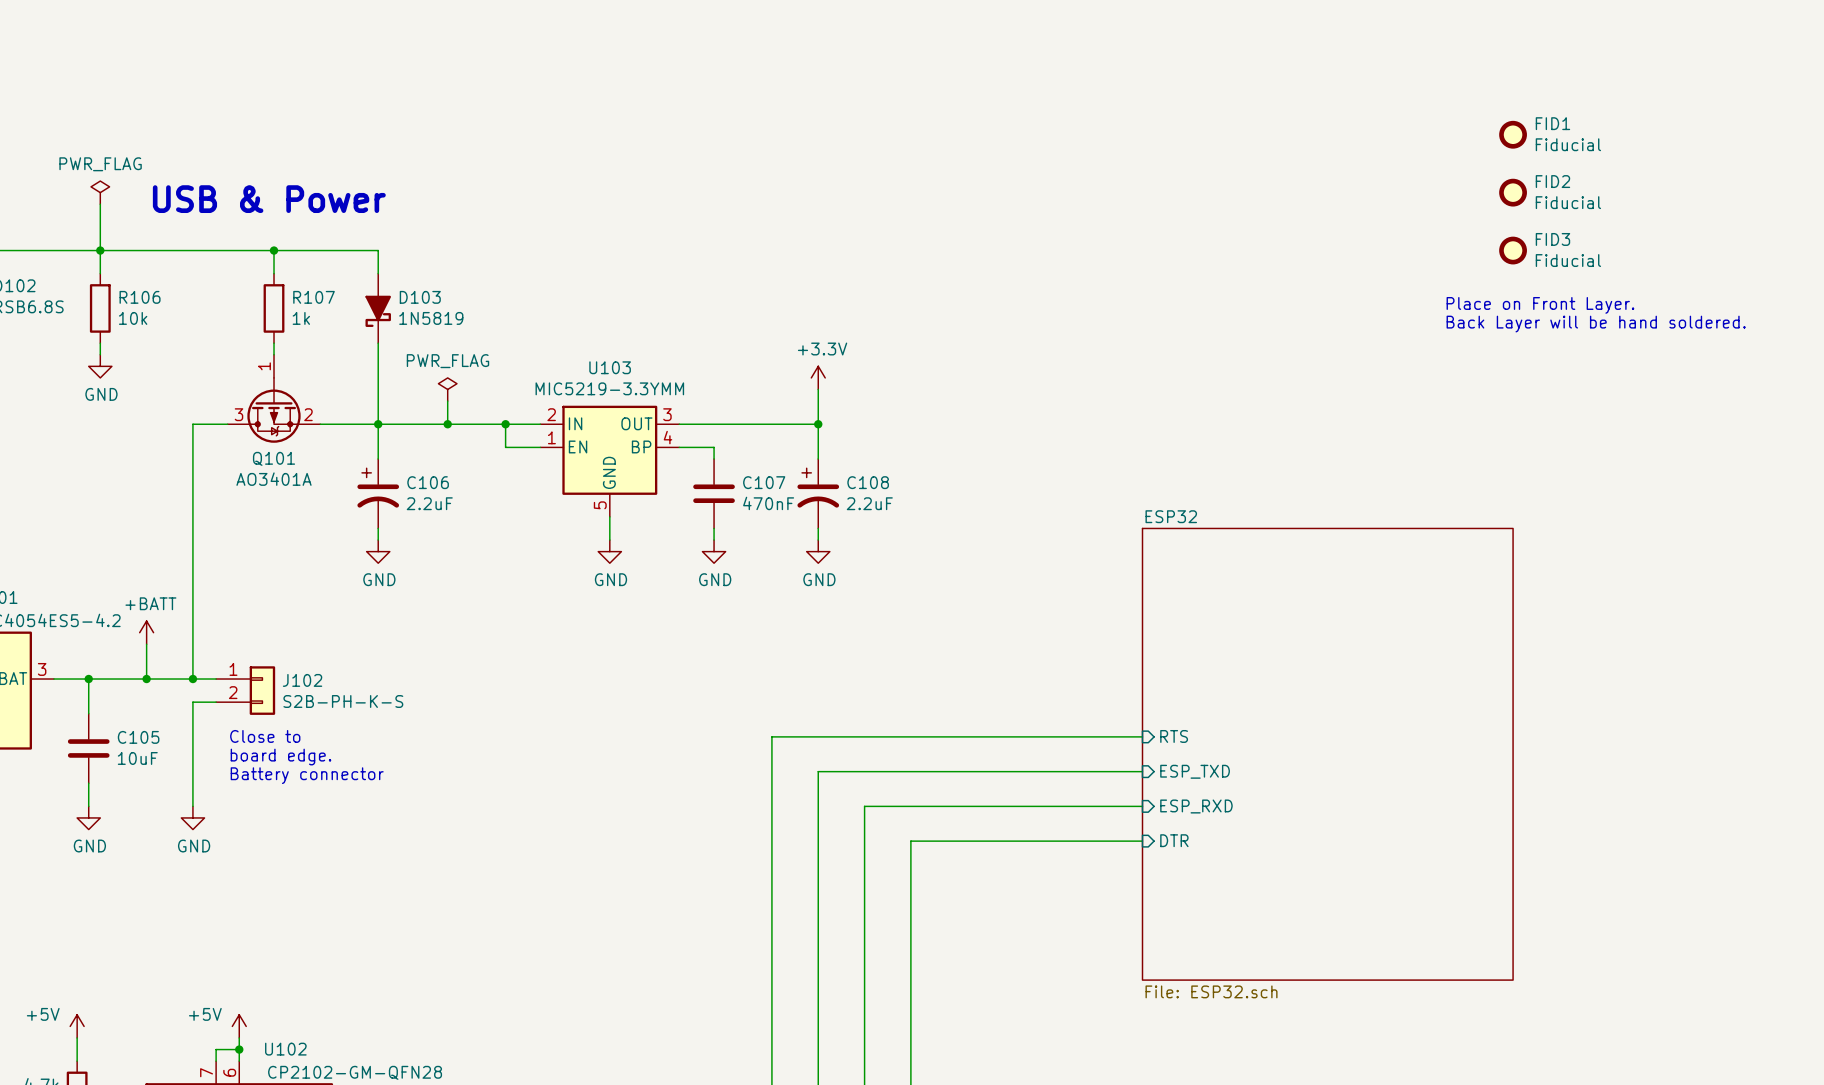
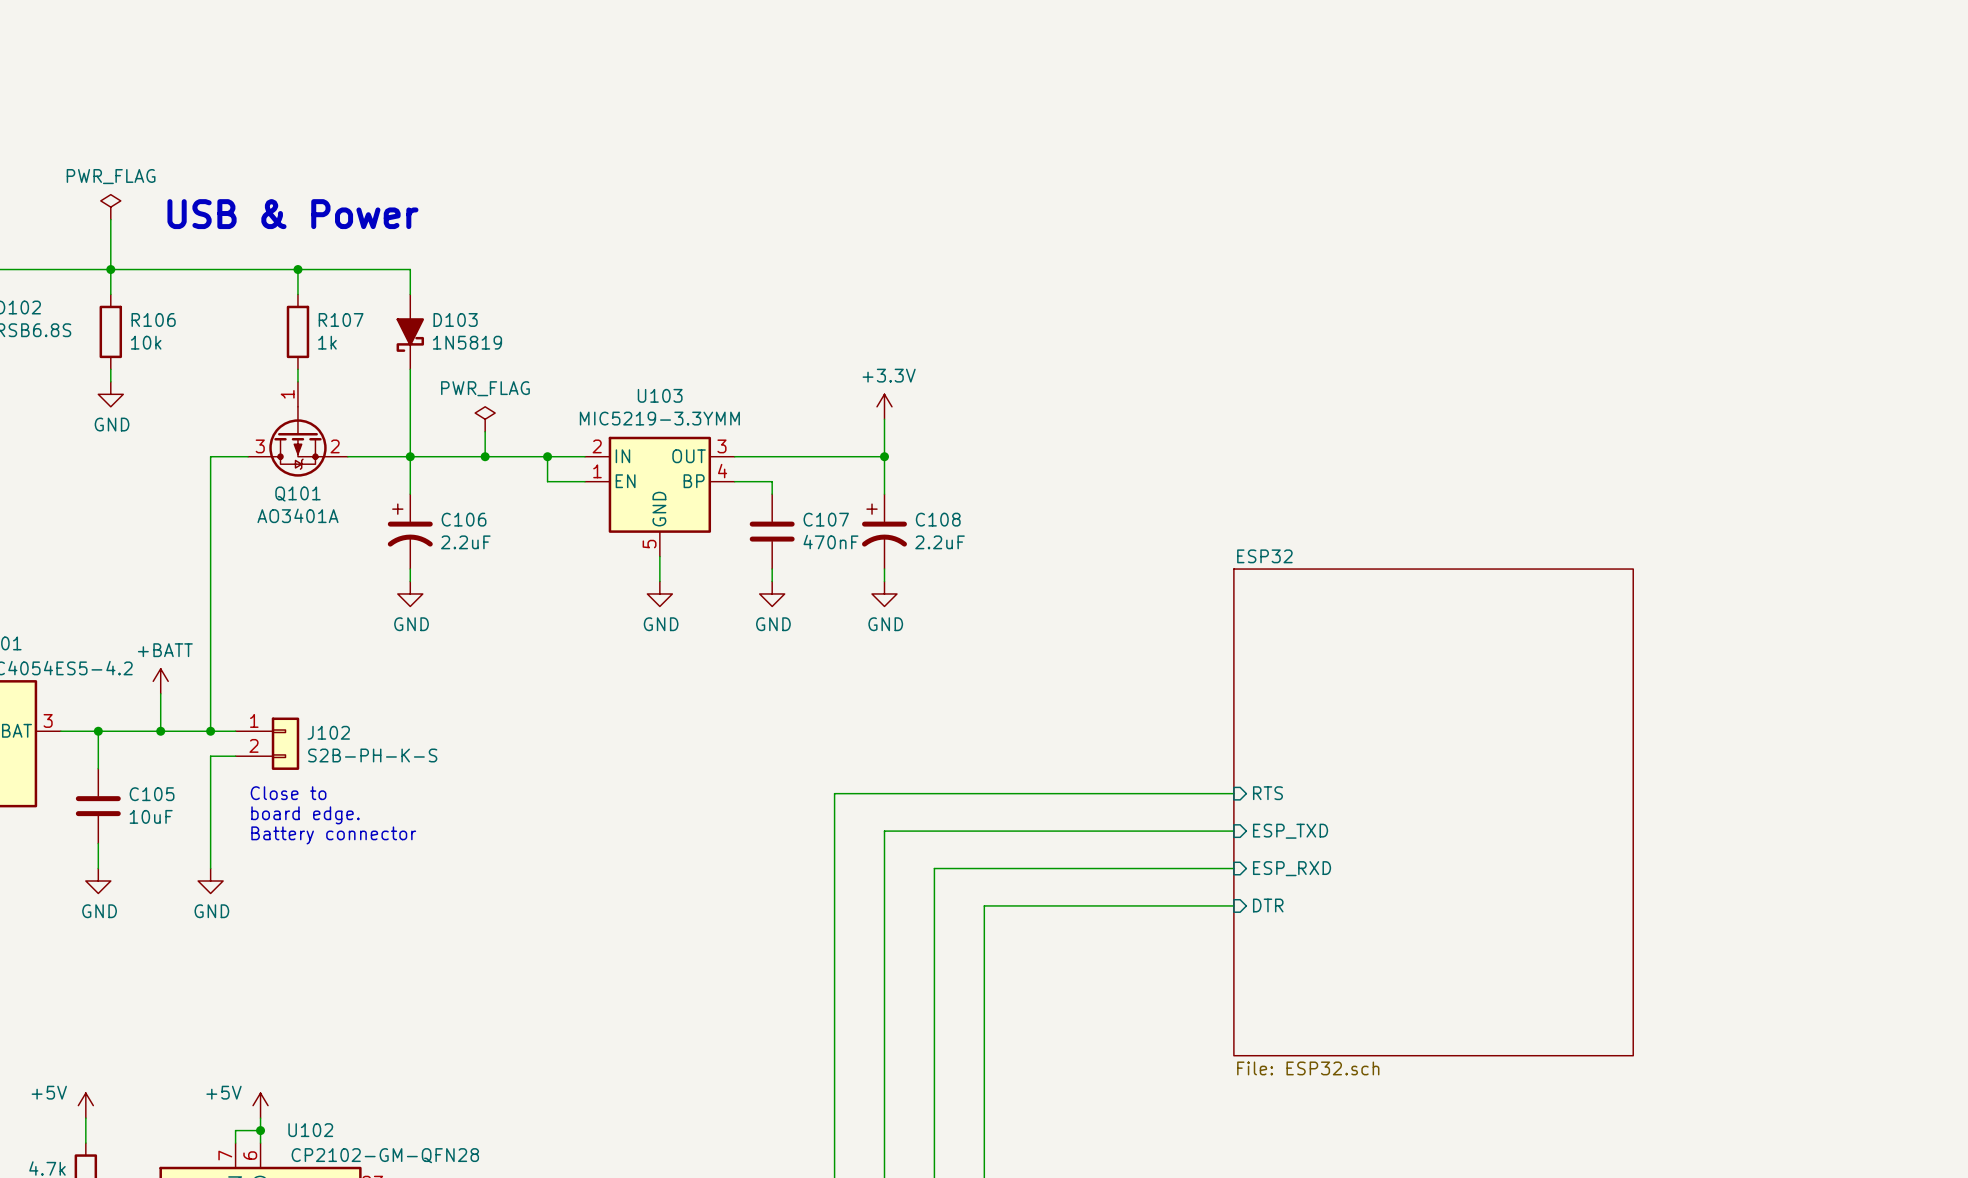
FID1: Fiducial (1513, 134) -> none
FID2: Fiducial (1513, 192) -> none
FID3: Fiducial (1513, 250) -> none
text: Place on Front Layer. (1540, 305) -> none
text: Back Layer will be hand soldered. (1596, 324) -> none

